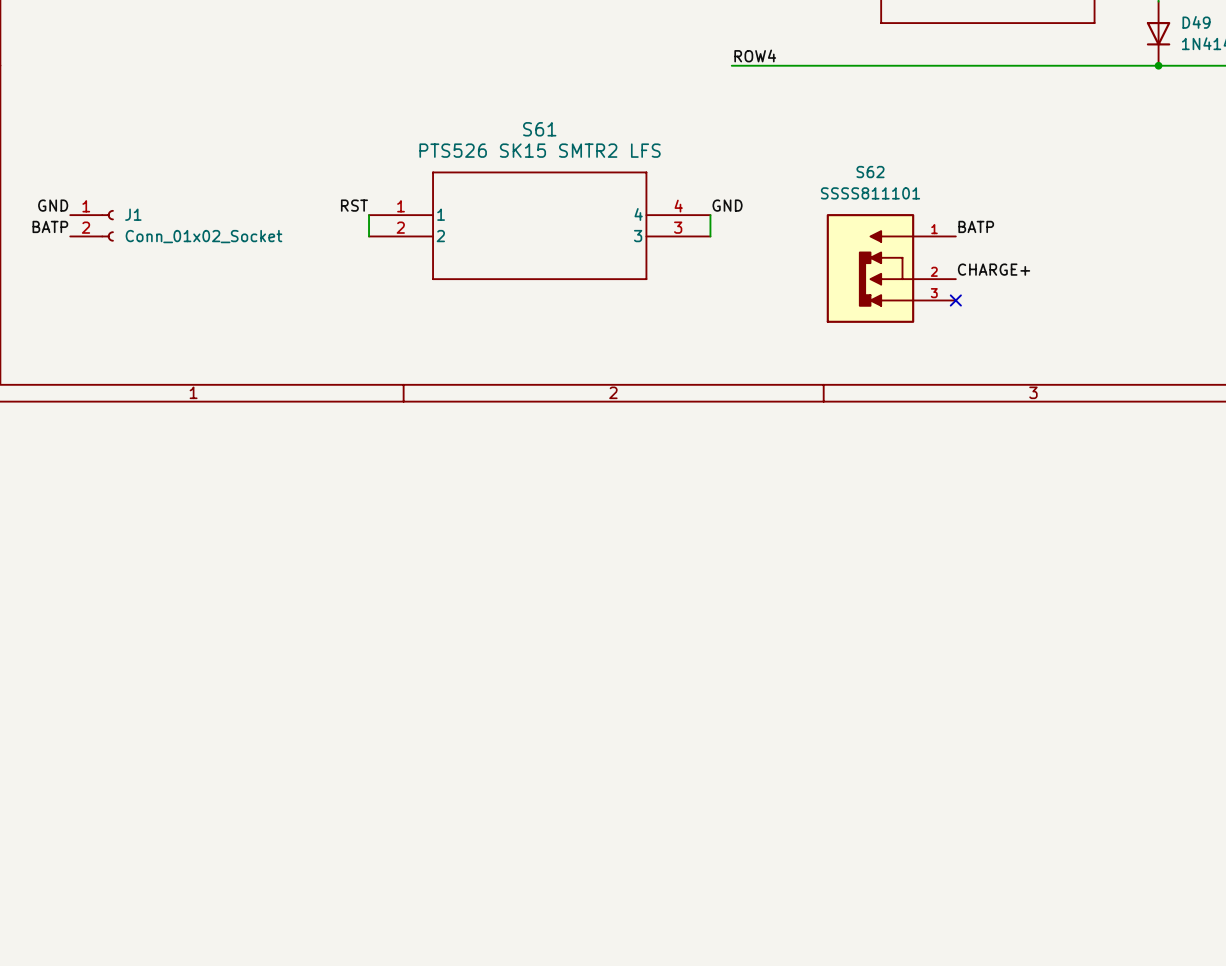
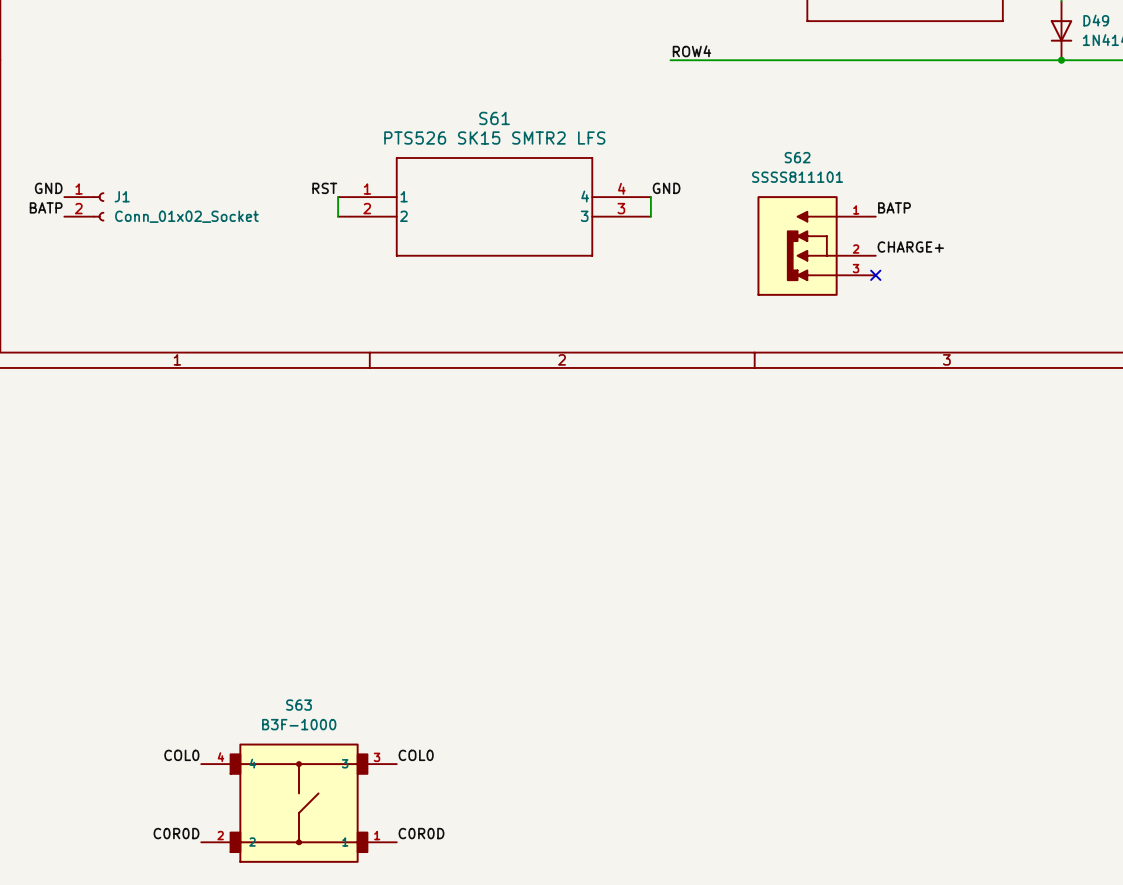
label: none -> COL0 (181, 755)
label: none -> COL0 (416, 755)
S63: none -> B3F-1000 (299, 803)
label: none -> C0R0D (176, 833)
label: none -> C0R0D (421, 833)

